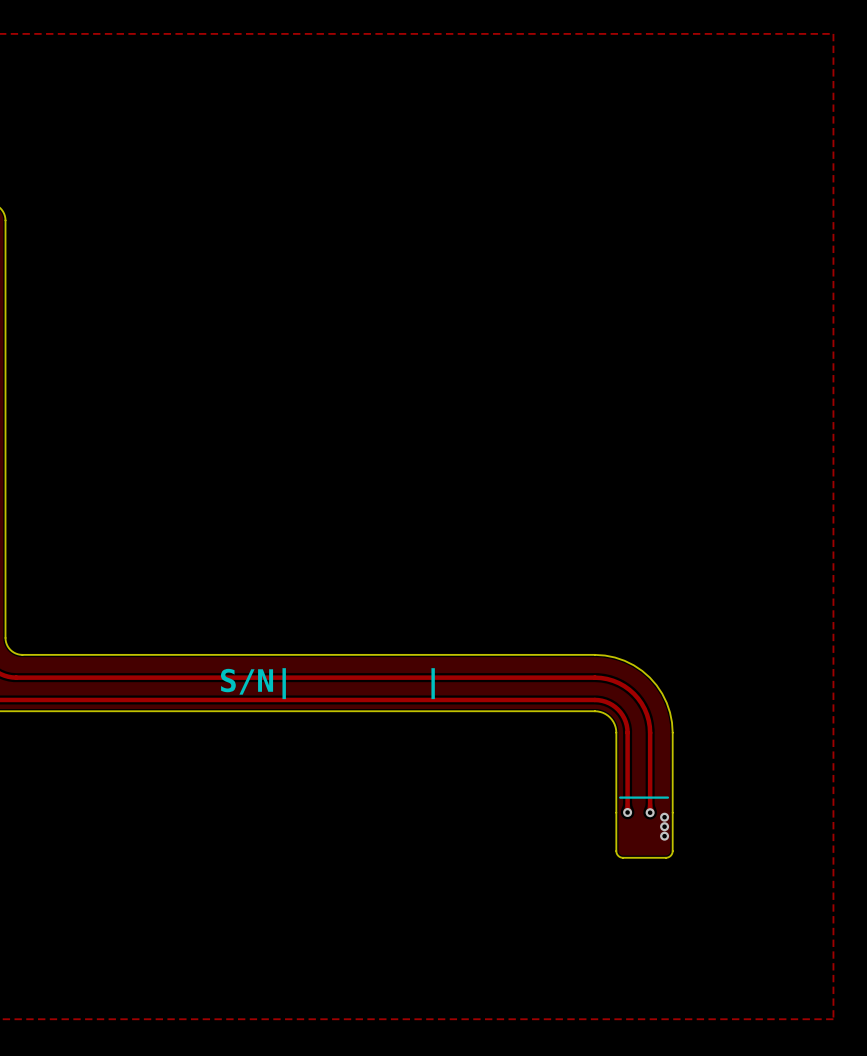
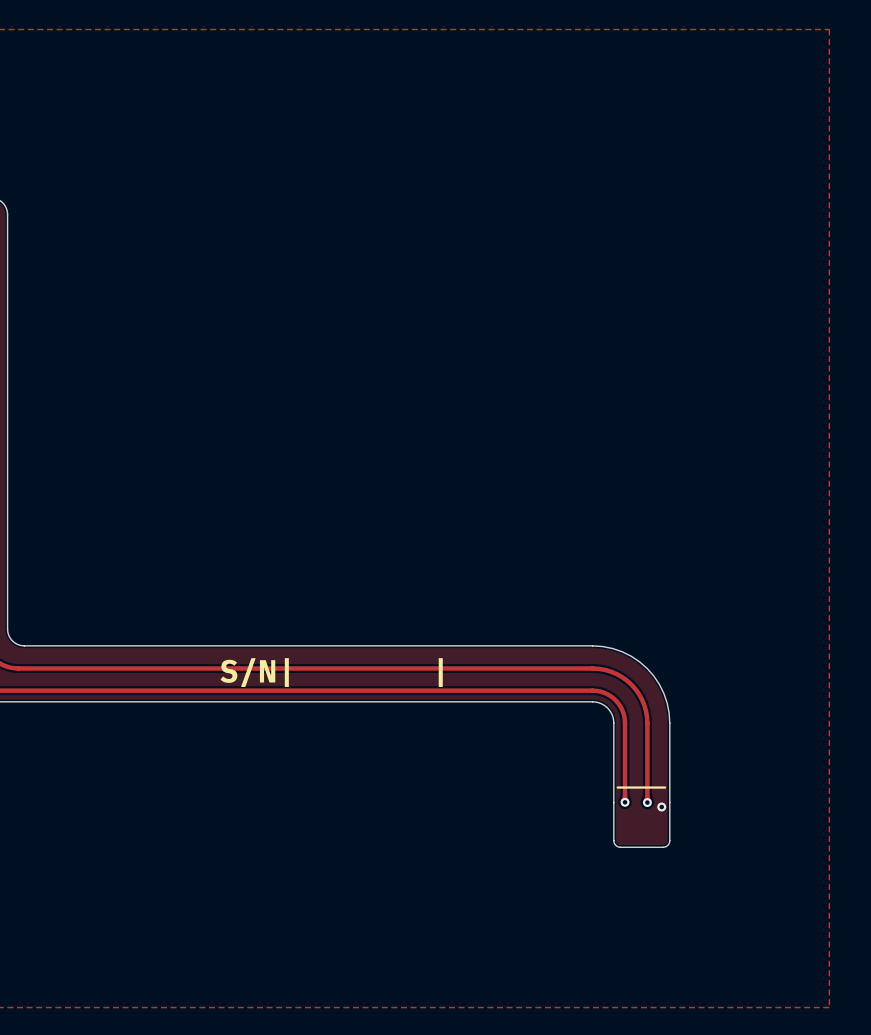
via: (664, 826) -> none
via: (664, 836) -> none

